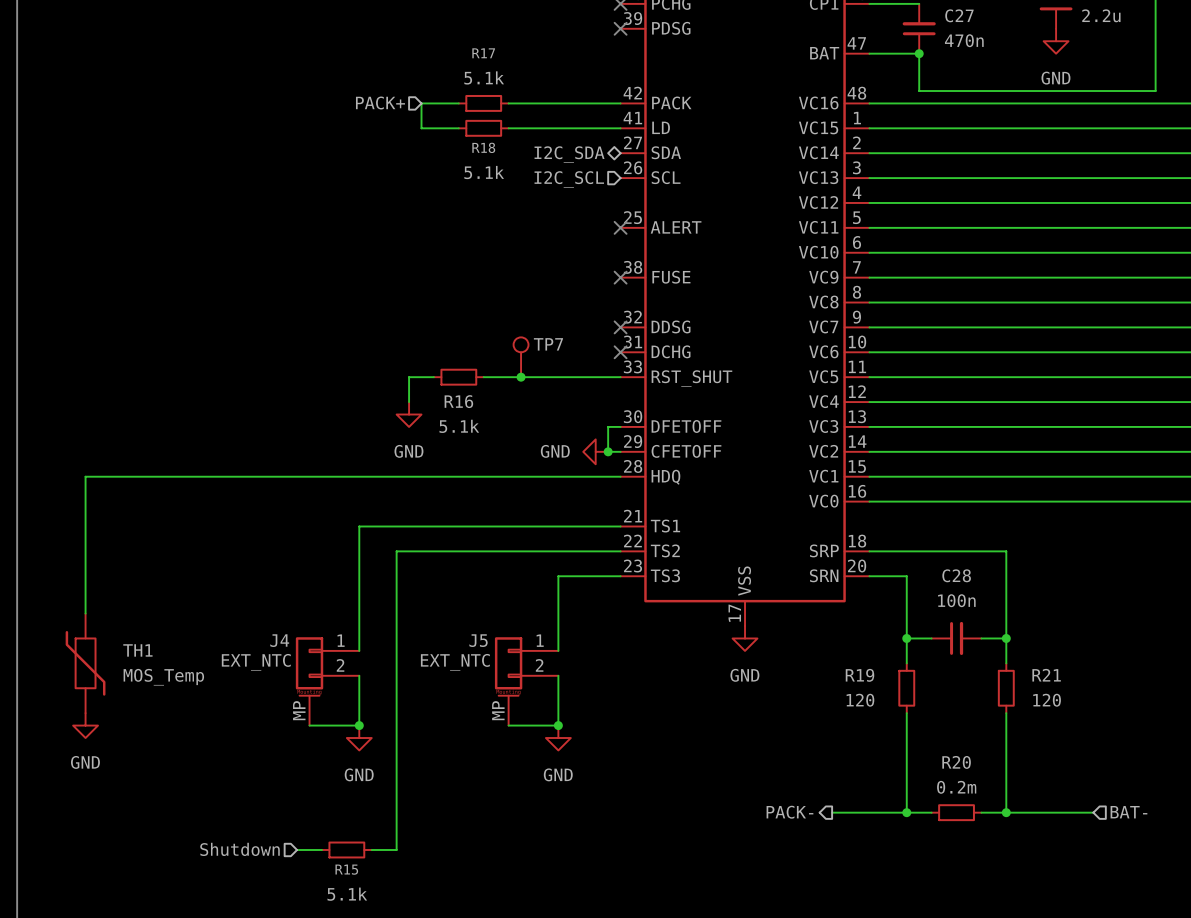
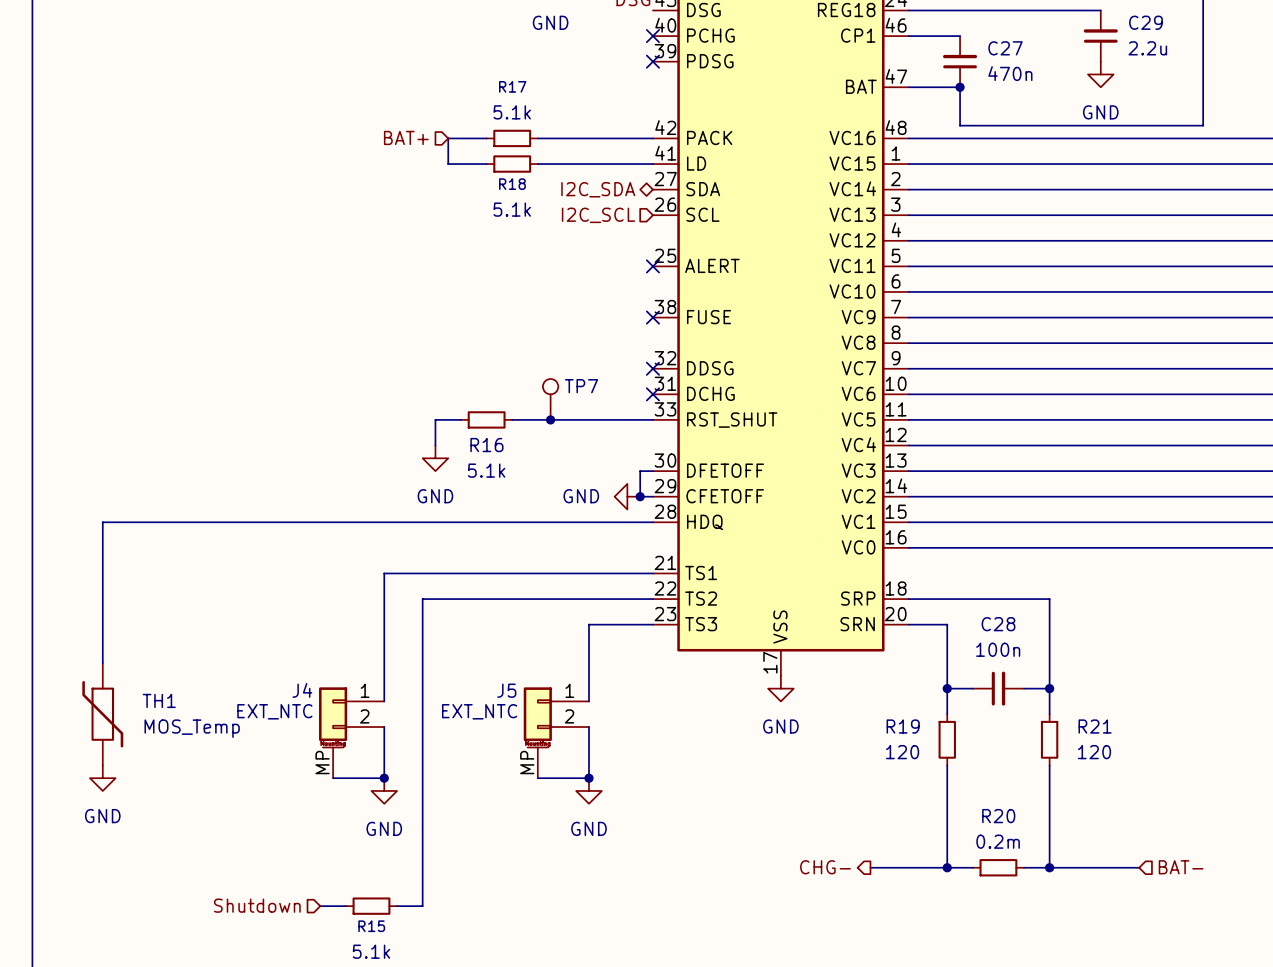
hierarchical label: PACK+ (380, 102) -> BAT+ (406, 137)
hierarchical label: PACK- (789, 812) -> CHG- (825, 867)

